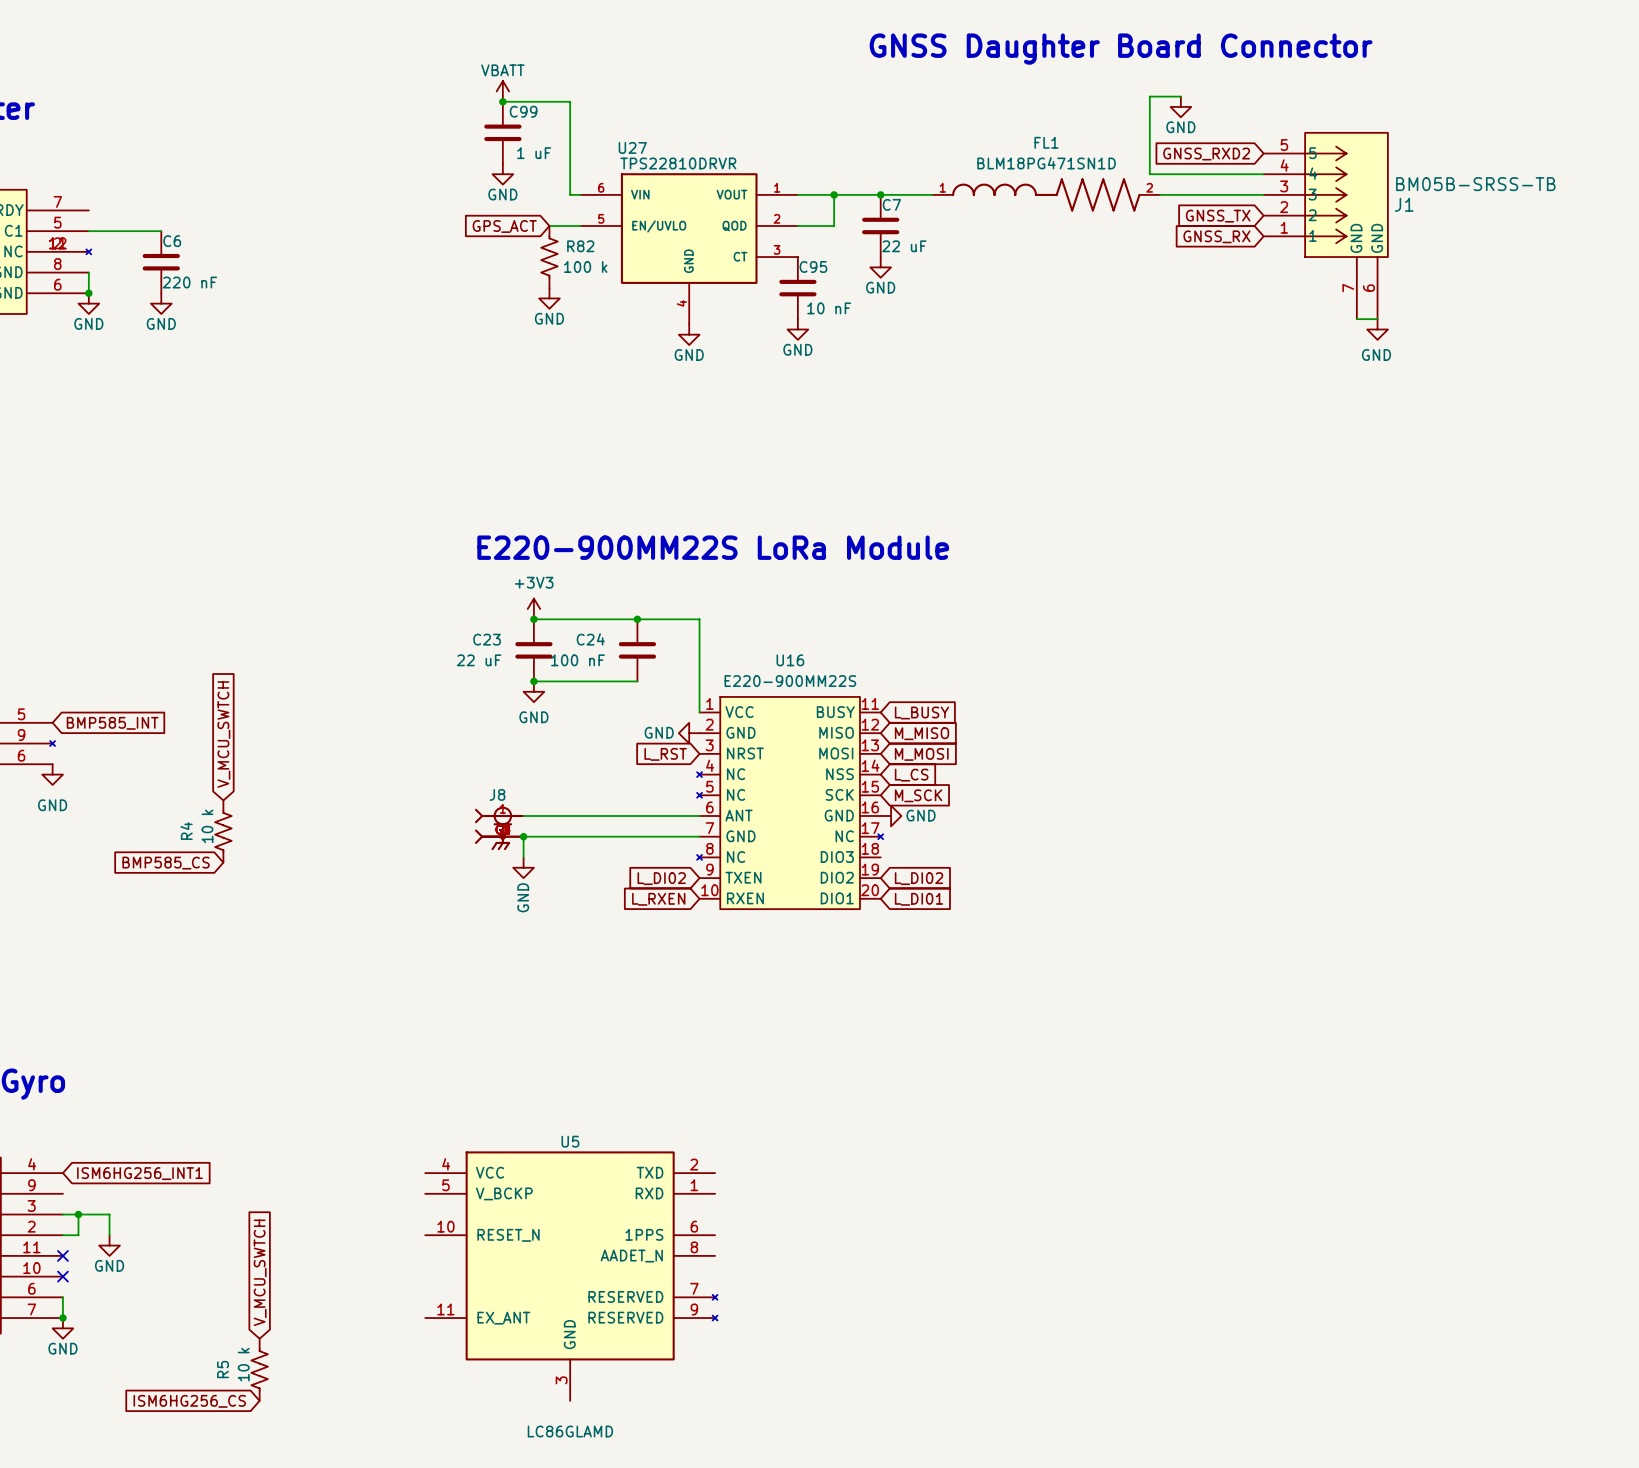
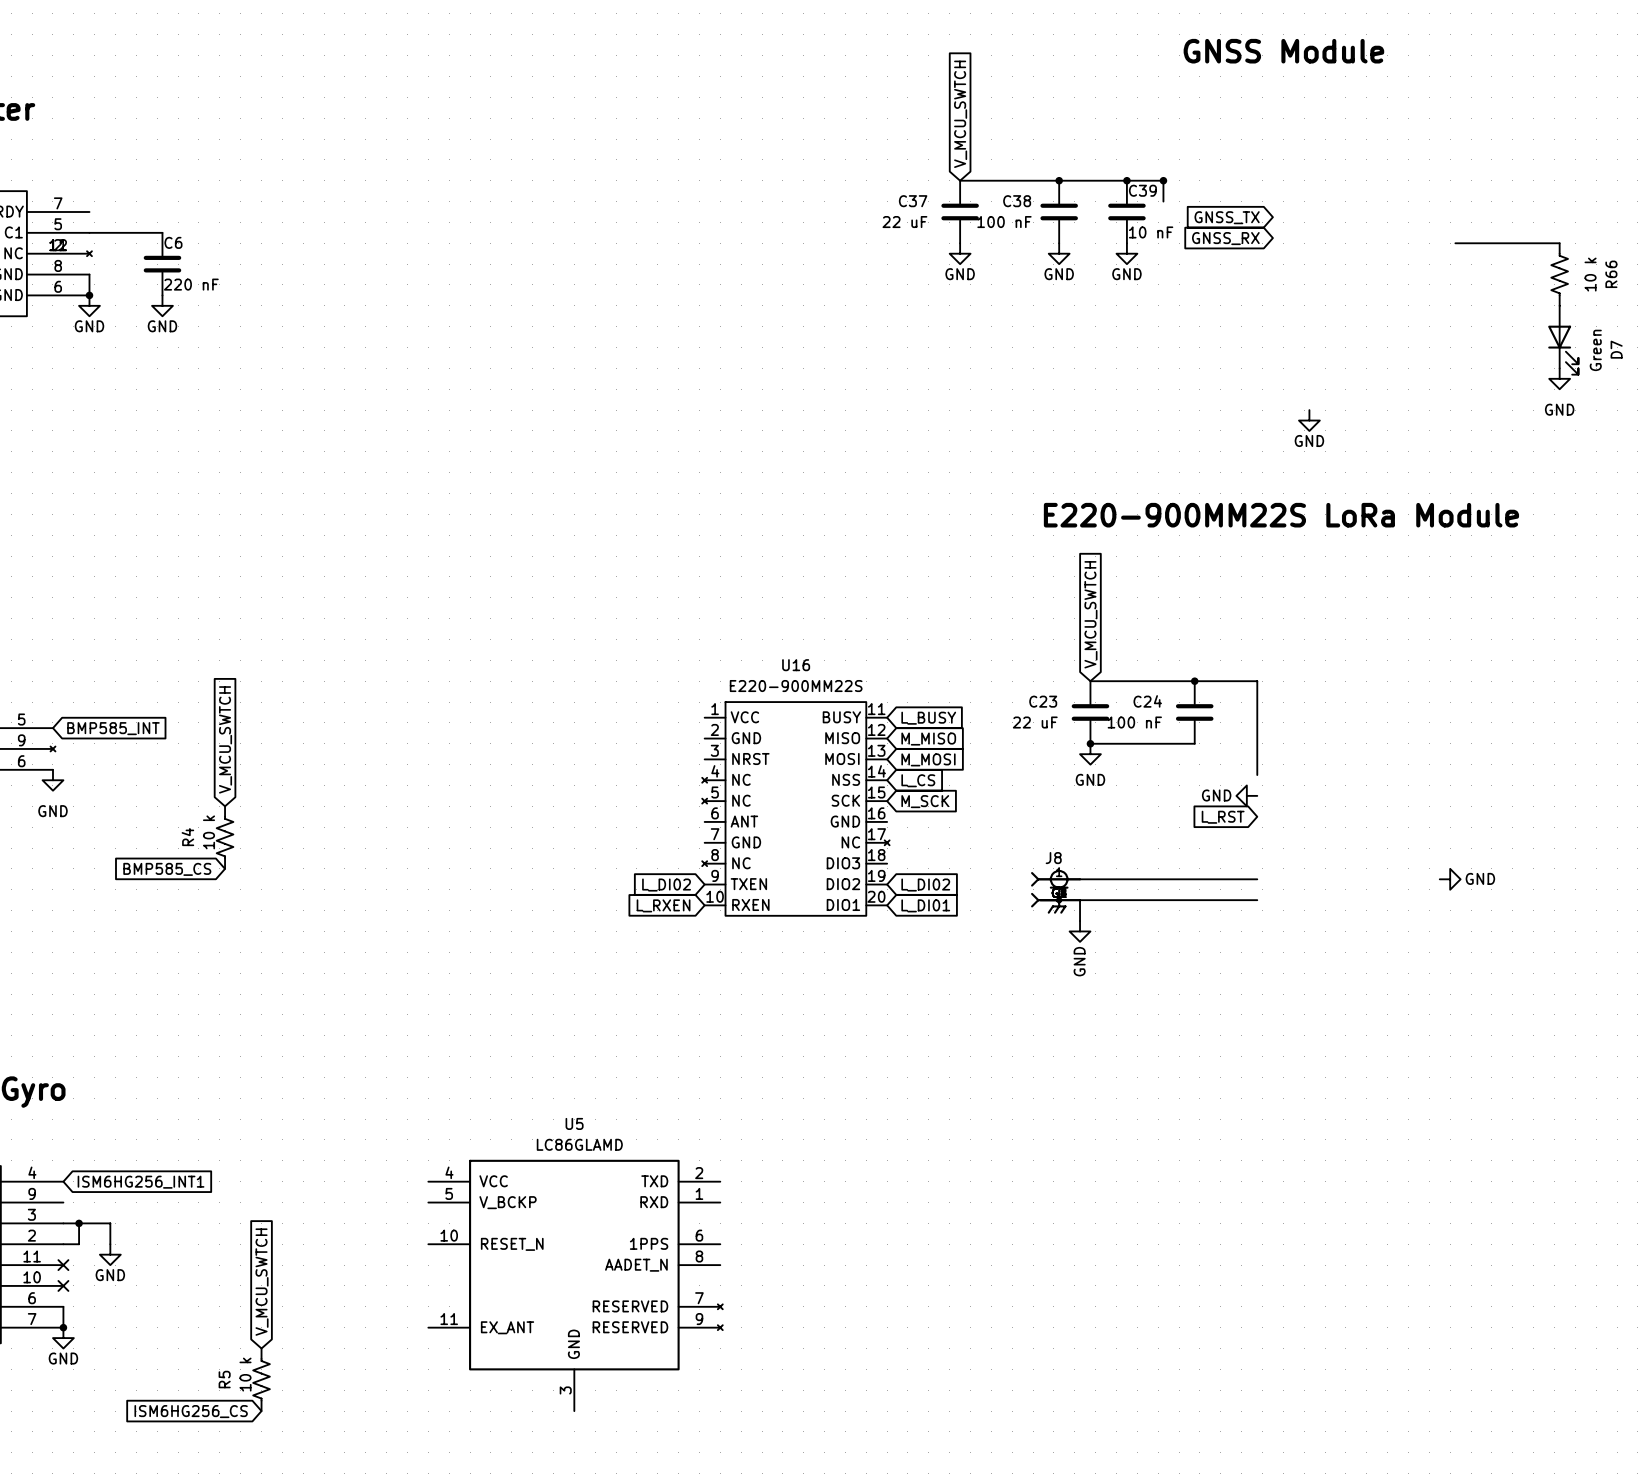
text: GNSS Daughter Board Connector (1121, 49) -> none
text: none -> GNSS Module (1283, 51)
power symbol: VBATT (502, 91) -> none
wire: (1180, 96) (1149, 96) (1149, 174) (1263, 174) -> none
wire: (502, 101) (570, 101) (570, 194) (580, 194) -> none
junction: (502, 101) -> none
power symbol: GND (1180, 106) -> none
global label: none -> V_MCU_SWTCH (960, 114)
C99: 1 uF (502, 132) -> none
global label: GNSS_RXD2 (1206, 154) -> none
power symbol: GND (502, 174) -> none
wire: none -> (960, 180) (1163, 180) (1163, 201)
junction: none -> (1059, 180)
junction: none -> (1126, 180)
junction: none -> (1163, 180)
wire: (797, 194) (932, 194) -> none
wire: (834, 194) (834, 225) (797, 225) -> none
junction: (834, 194) -> none
junction: (880, 194) -> none
FL1: BLM18PG471SN1D (1046, 194) -> none
wire: (1160, 194) (1263, 194) -> none
C37: none -> 22 uF (960, 212)
C38: none -> 100 nF (1059, 212)
C39: none -> 10 nF (1126, 212)
wire: (549, 225) (580, 225) -> none
C7: 22 uF (880, 225) -> none
J1: BM05B-SRSS-TB (1325, 225) -> none
global label: GPS_ACT (504, 226) -> none
wire: none -> (1455, 243) (1559, 243)
U27: TPS22810DRVR (689, 248) -> none
power symbol: none -> GND (1059, 253)
power symbol: none -> GND (1126, 253)
R82: 100 k (549, 257) -> none
power symbol position: GND (880, 267) -> GND (960, 253)
R66: none -> 10 k (1559, 274)
C95: 10 nF (797, 288) -> none
power symbol: GND (549, 298) -> none
wire: (1356, 319) (1377, 319) -> none
power symbol: GND (797, 329) -> none
power symbol: GND (1377, 329) -> none
power symbol: GND (689, 334) -> none
D7: none -> Green (1563, 340)
power symbol: none -> GND (1559, 378)
power symbol: none -> GND (1309, 420)
text: none -> E220-900MM22S LoRa Module (1281, 515)
text: E220-900MM22S LoRa Module (713, 547) -> none
power symbol: +3V3 (533, 608) -> none
global label: none -> V_MCU_SWTCH (1090, 614)
wire: (533, 619) (699, 619) (699, 712) -> none
junction: (533, 619) -> none
junction: (637, 619) -> none
C23 position: (533, 650) -> (1090, 712)
C24 position: (637, 650) -> (1194, 712)
wire: none -> (1090, 681) (1257, 681) (1257, 775)
junction: none -> (1194, 681)
wire: (533, 681) (637, 681) -> none
junction: (533, 681) -> none
power symbol: GND (533, 691) -> none
power symbol: GND (689, 733) -> none
wire: none -> (1090, 743) (1194, 743)
junction: none -> (1090, 743)
power symbol: none -> GND (1090, 754)
global label: L_RST (665, 754) -> none
power symbol: none -> GND (1246, 795)
global label: none -> L_RST (1223, 817)
wire: (523, 816) (699, 816) -> none
power symbol: GND (891, 816) -> none
J8 position: (499, 828) -> (1056, 891)
junction: (523, 836) -> none
wire: (699, 836) (523, 836) (523, 857) -> none
power symbol: GND (523, 867) -> none
wire: none -> (1080, 879) (1257, 879)
power symbol: none -> GND (1450, 879)
wire: none -> (1257, 900) (1080, 900) (1080, 921)
power symbol: none -> GND (1080, 931)
U5 name position: U5 (570, 1141) -> U5 (574, 1123)
U5 value position: LC86GLAMD (570, 1431) -> LC86GLAMD (579, 1144)

